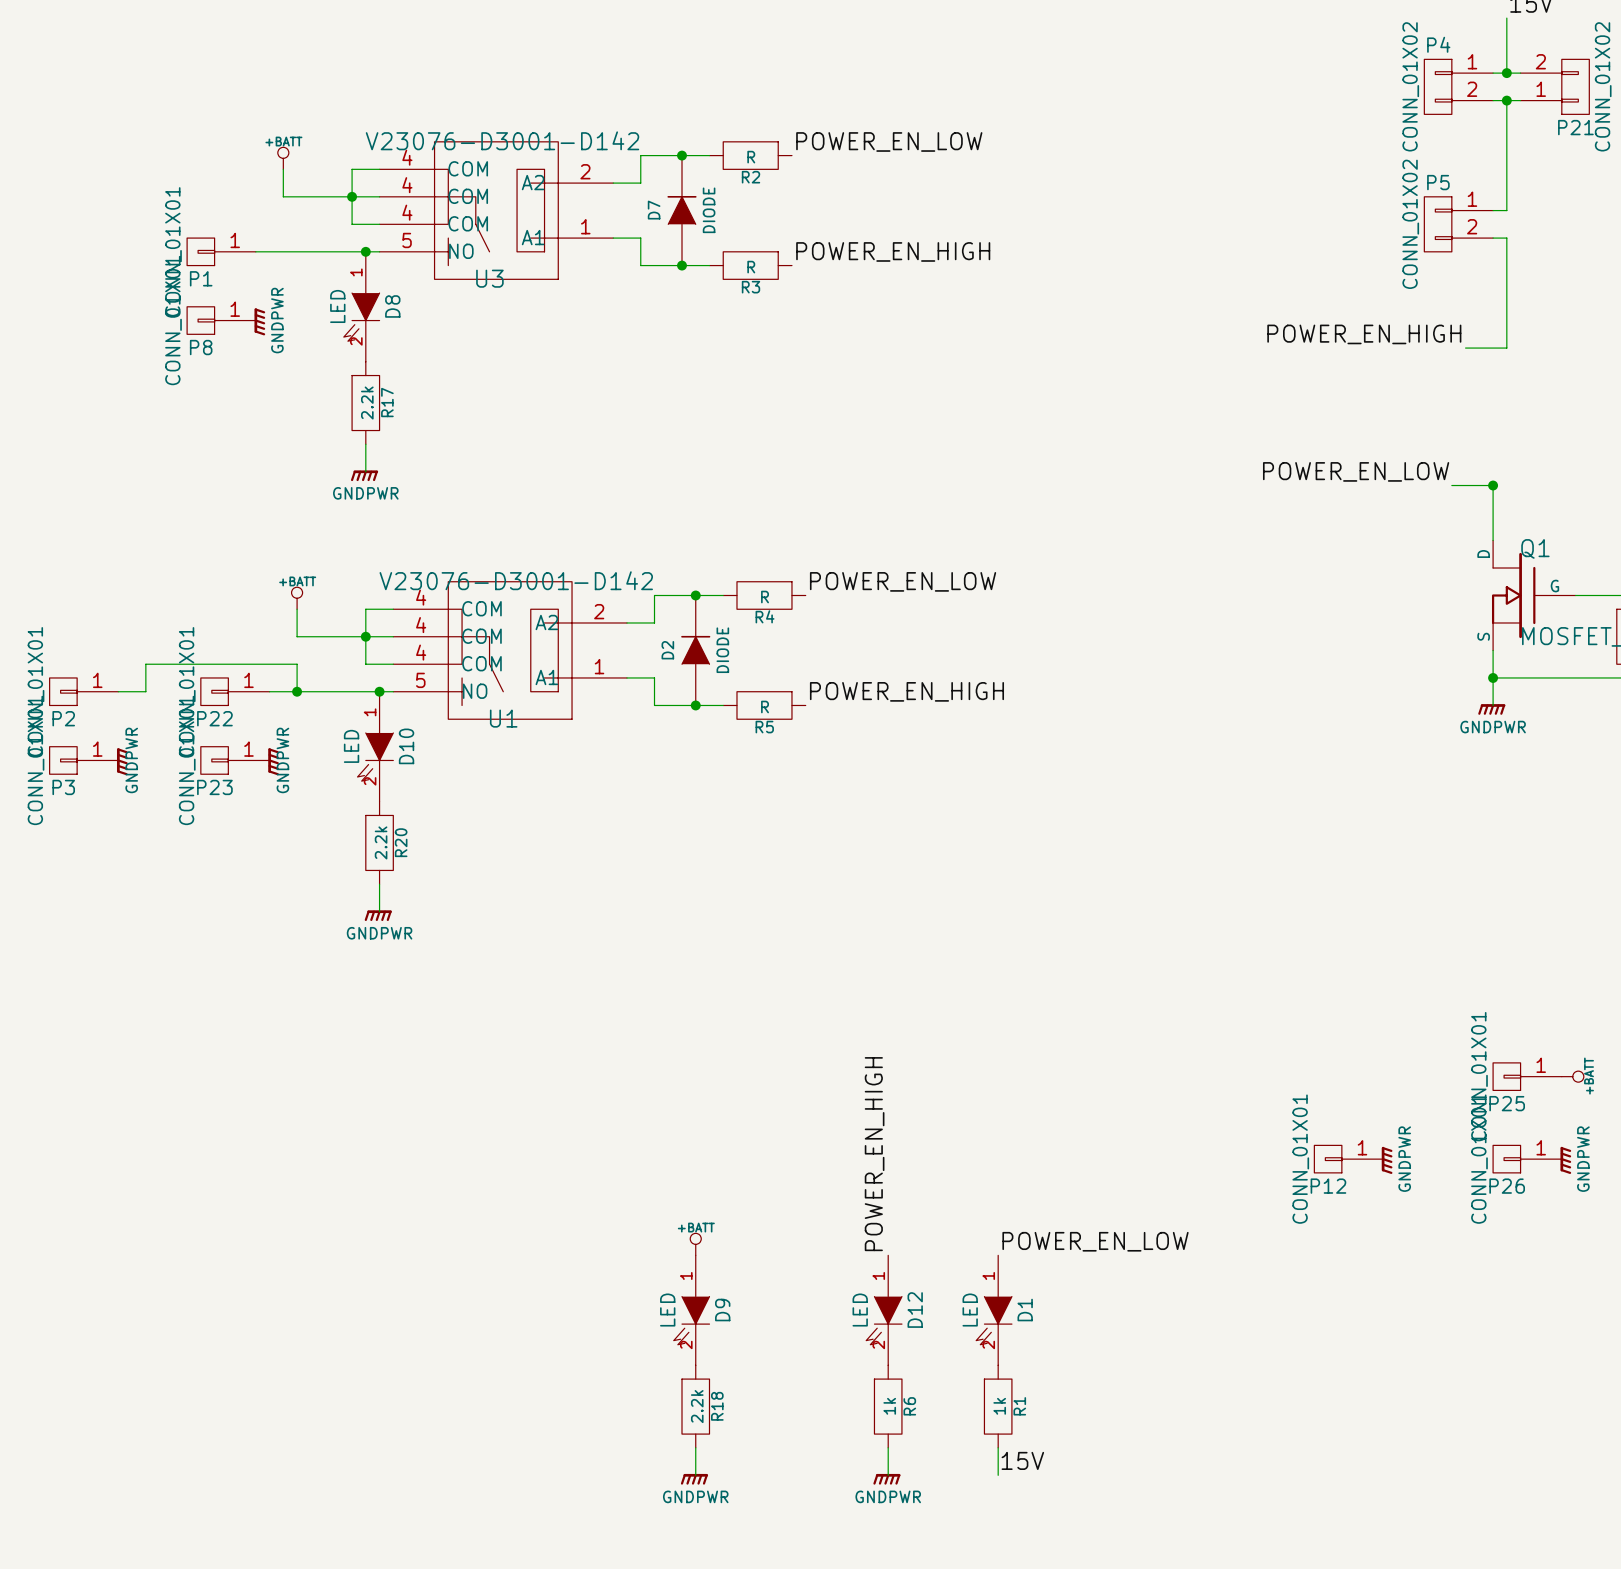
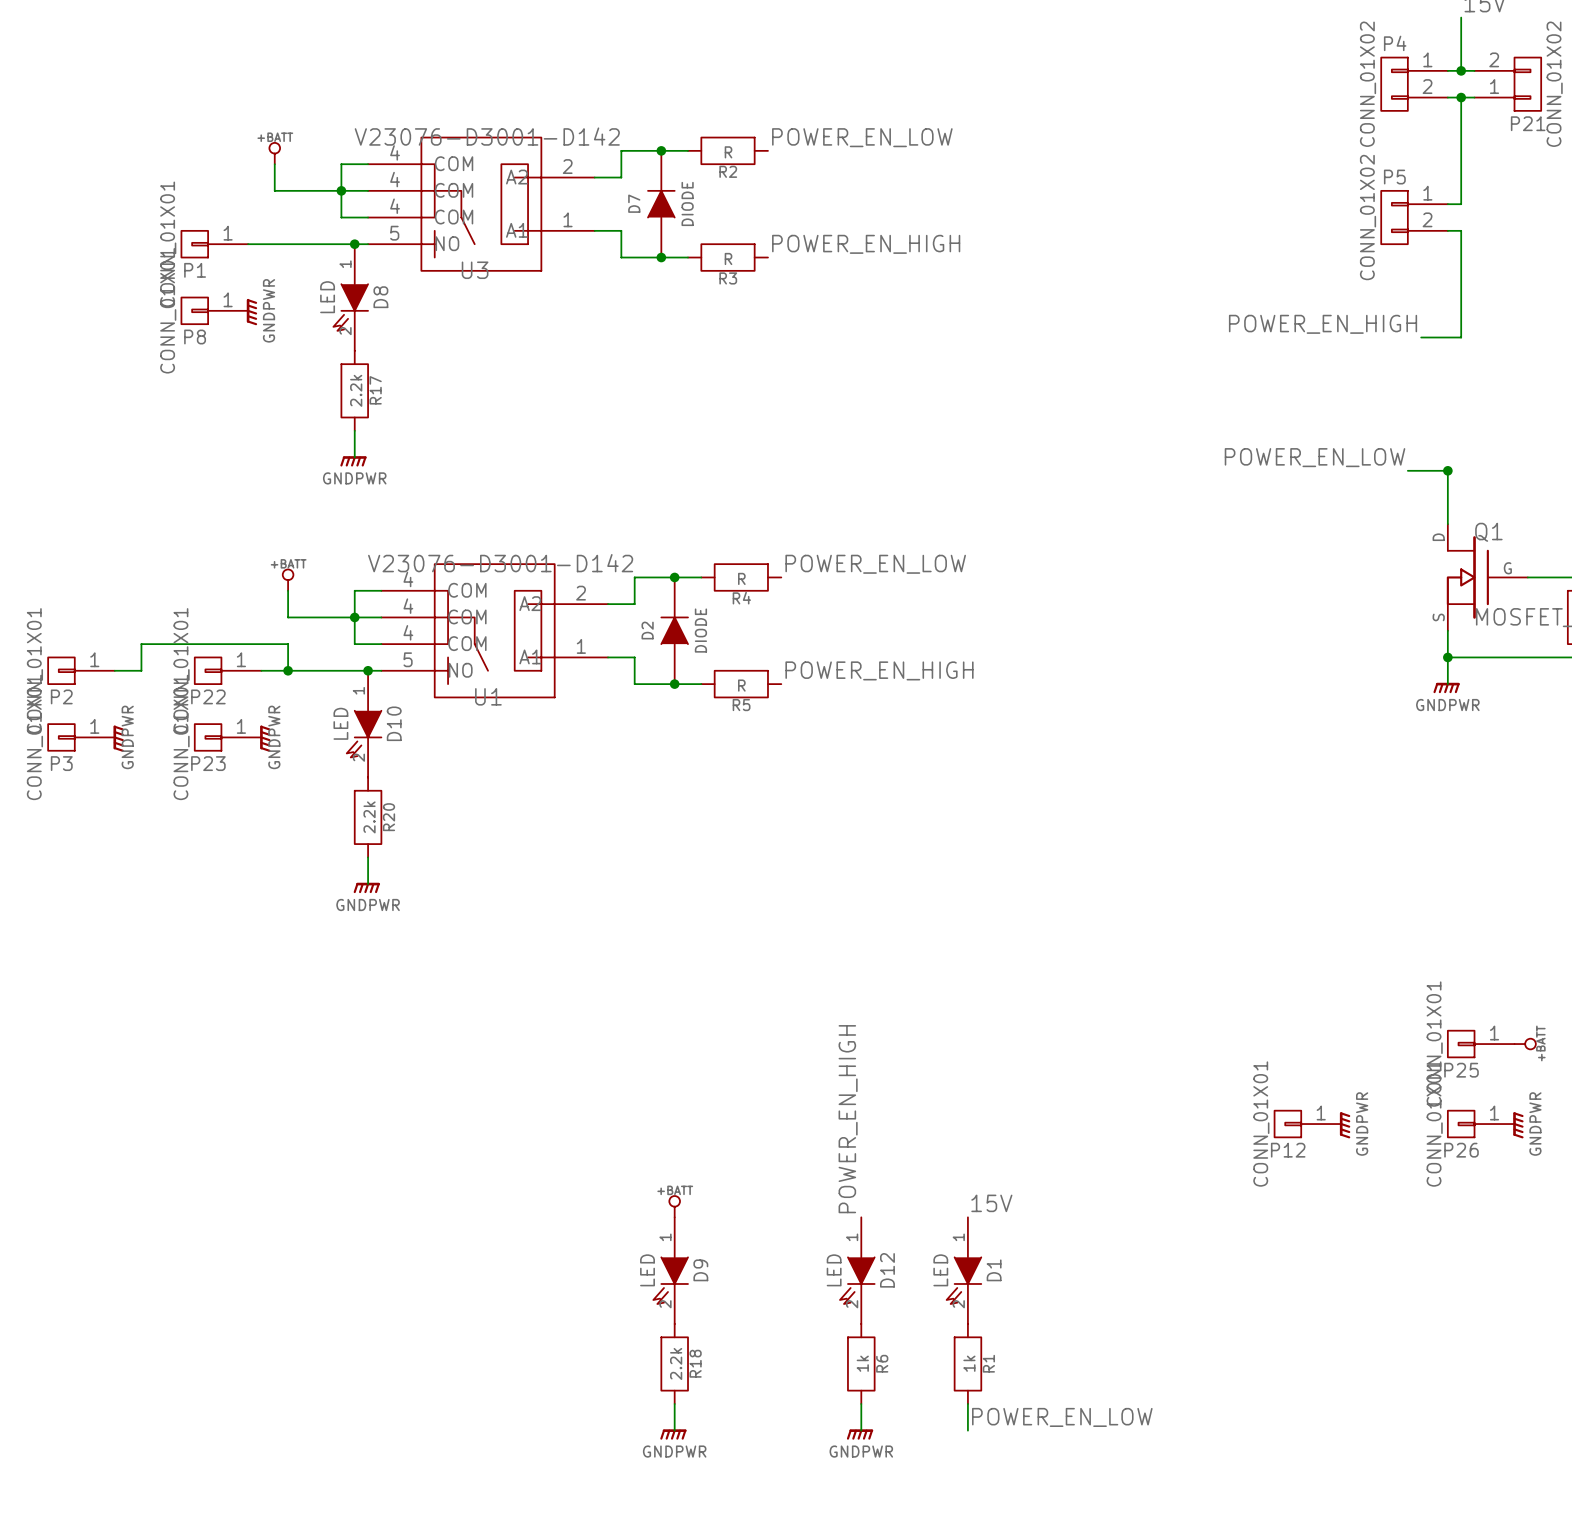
label: POWER_EN_LOW (1095, 1241) -> 15V (991, 1203)
label: 15V (1022, 1460) -> POWER_EN_LOW (1062, 1417)

